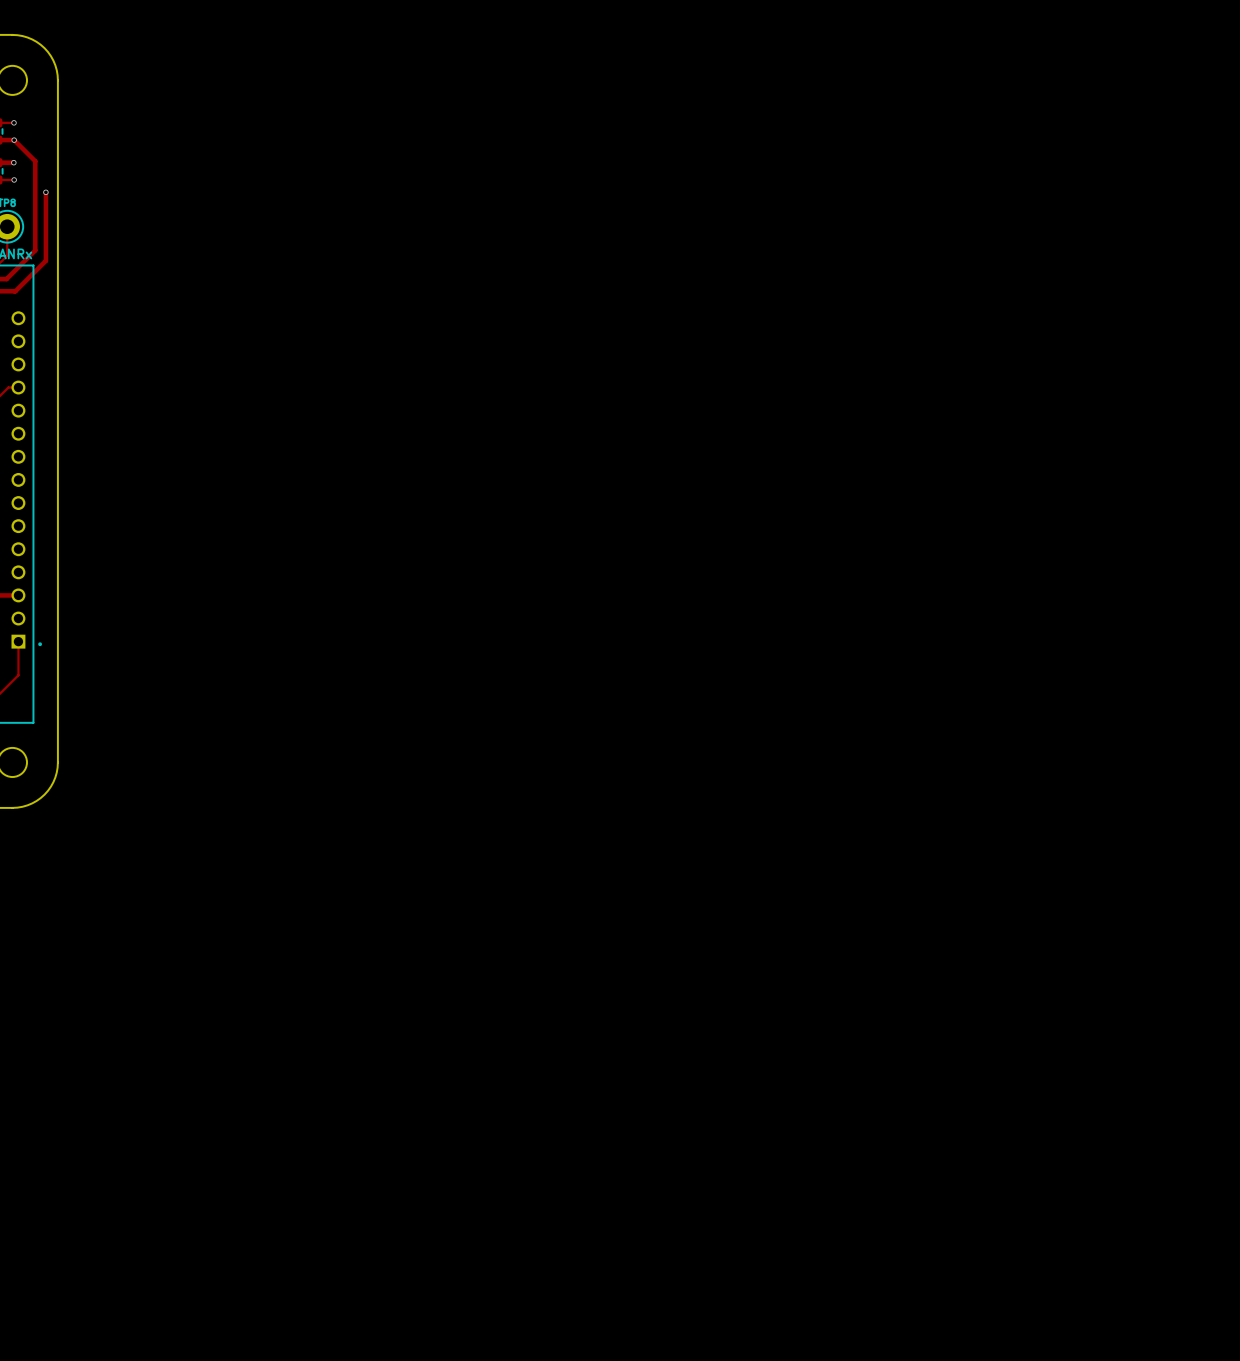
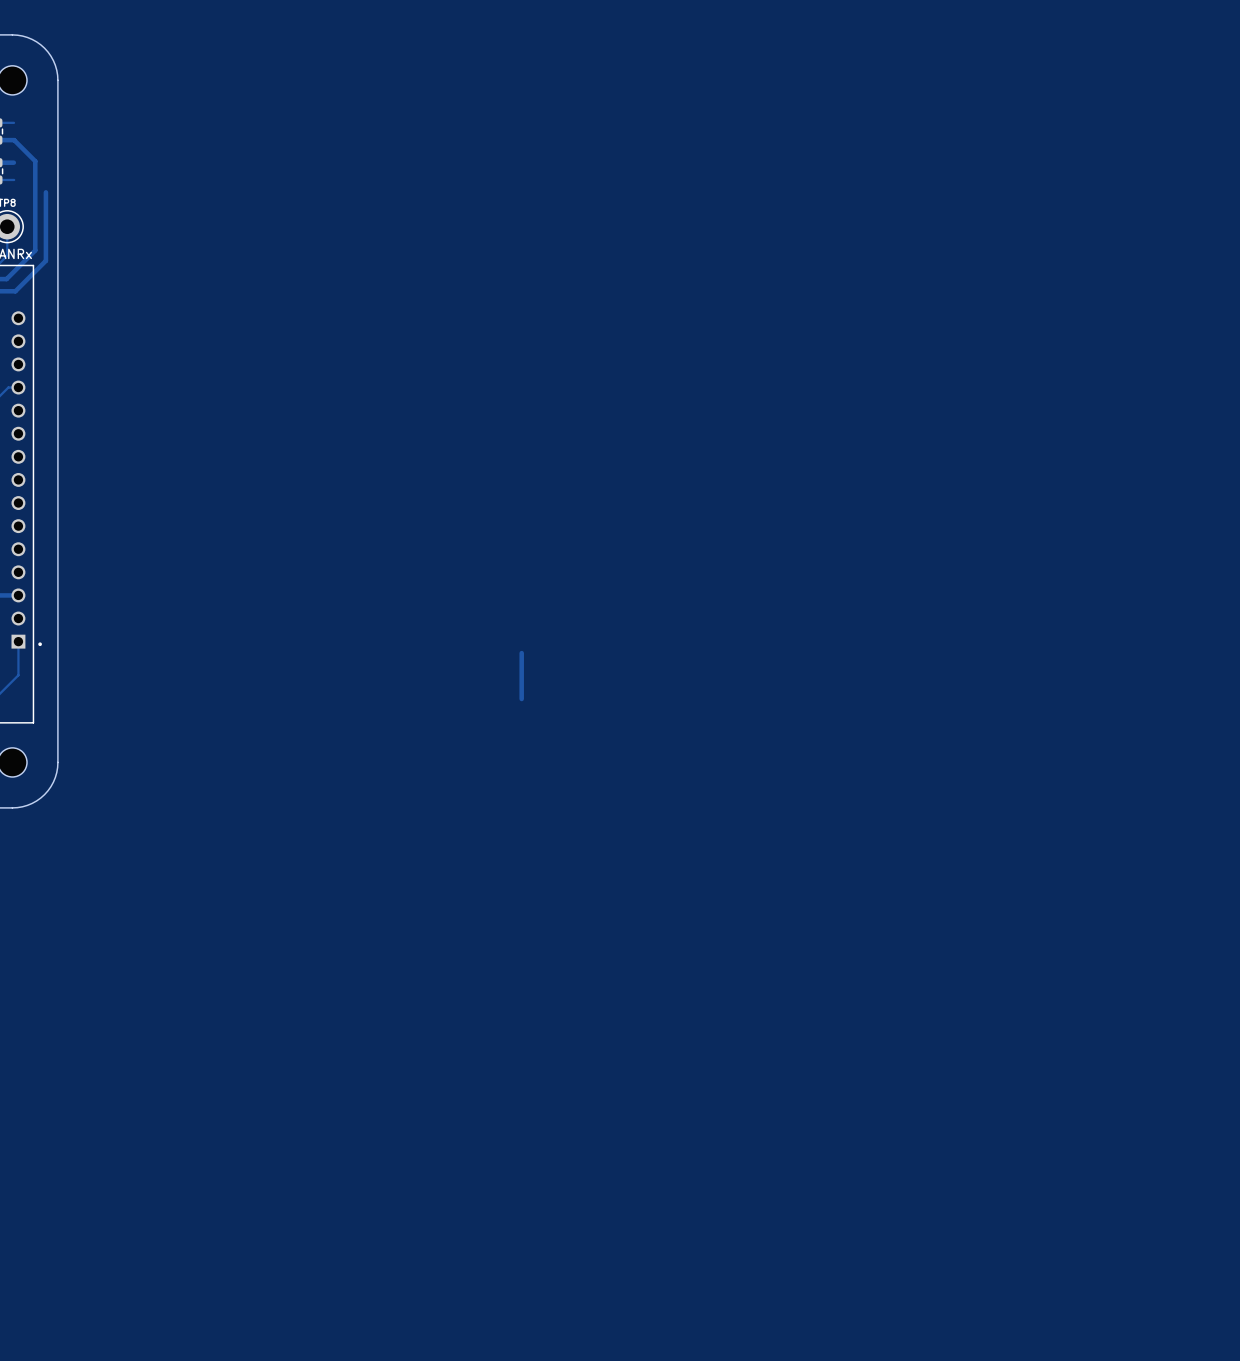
via: (13, 122) -> none
via: (14, 140) -> none
via: (13, 162) -> none
via: (14, 179) -> none
via: (45, 192) -> none
track: none -> (521, 653) (521, 699)

